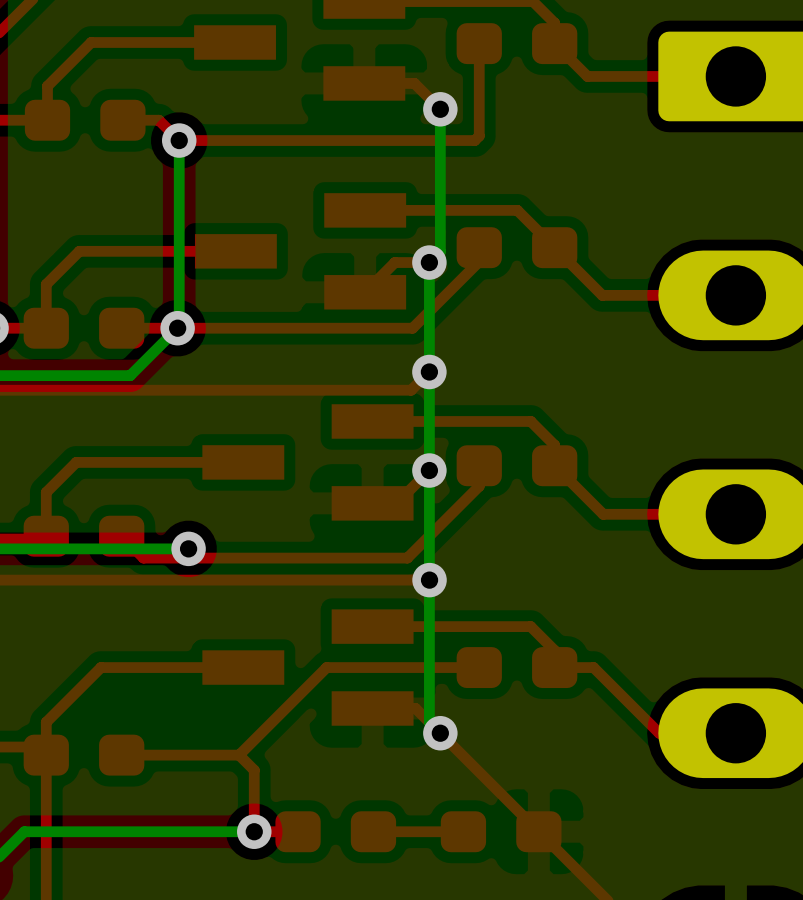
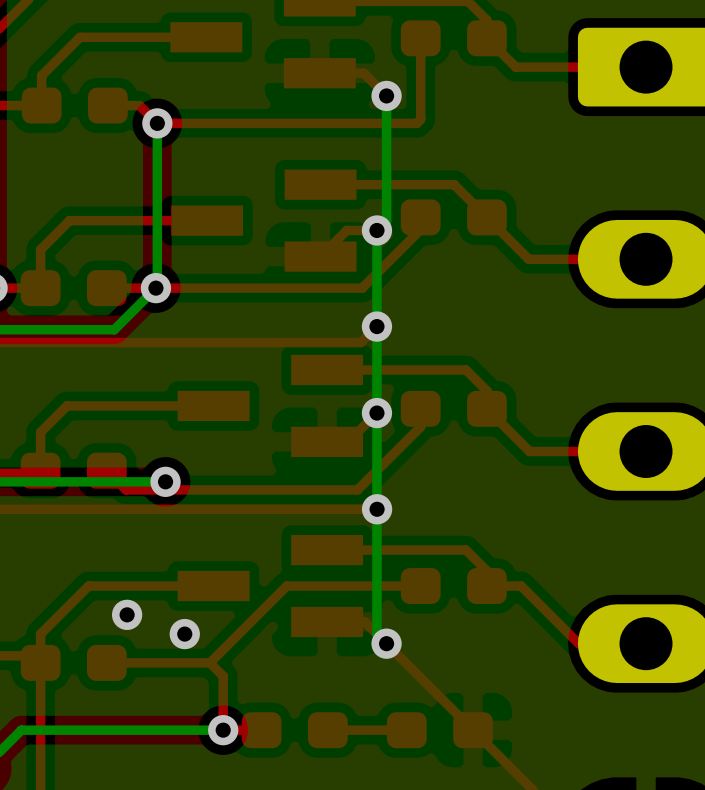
via: none -> (127, 614)
via: none -> (184, 634)

